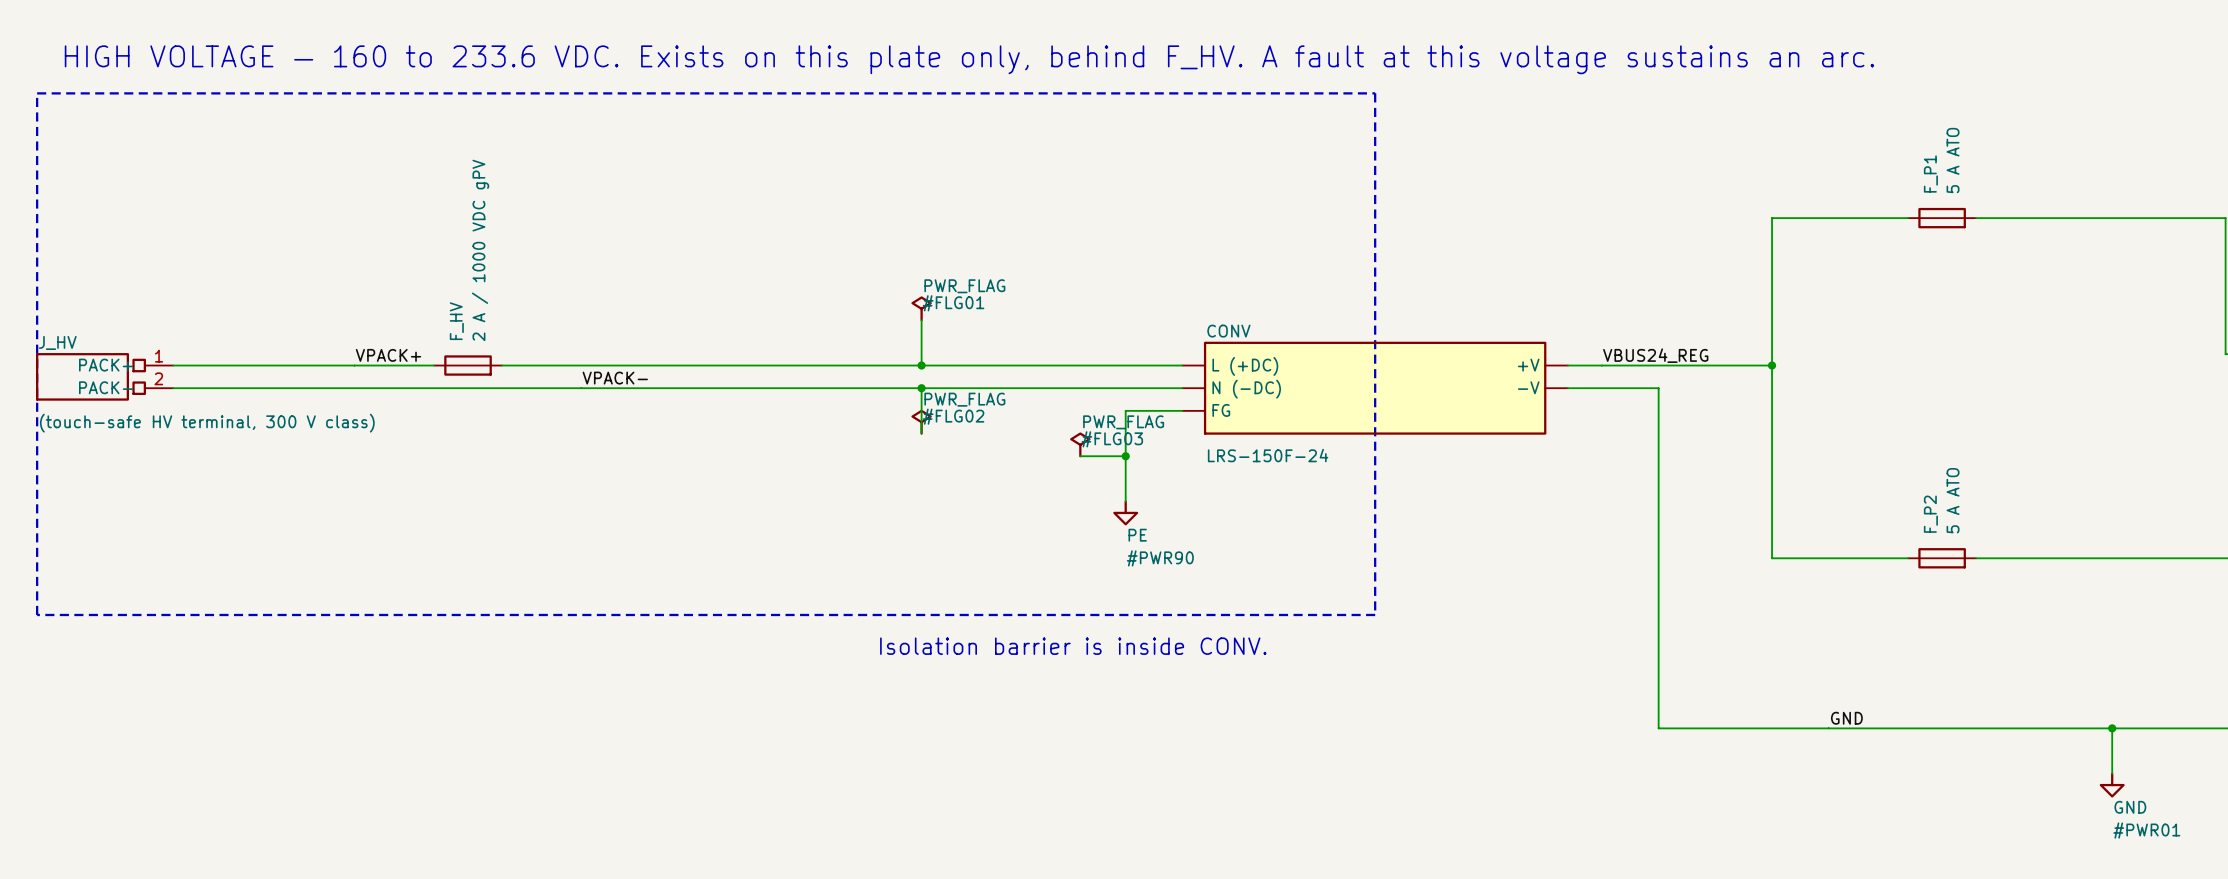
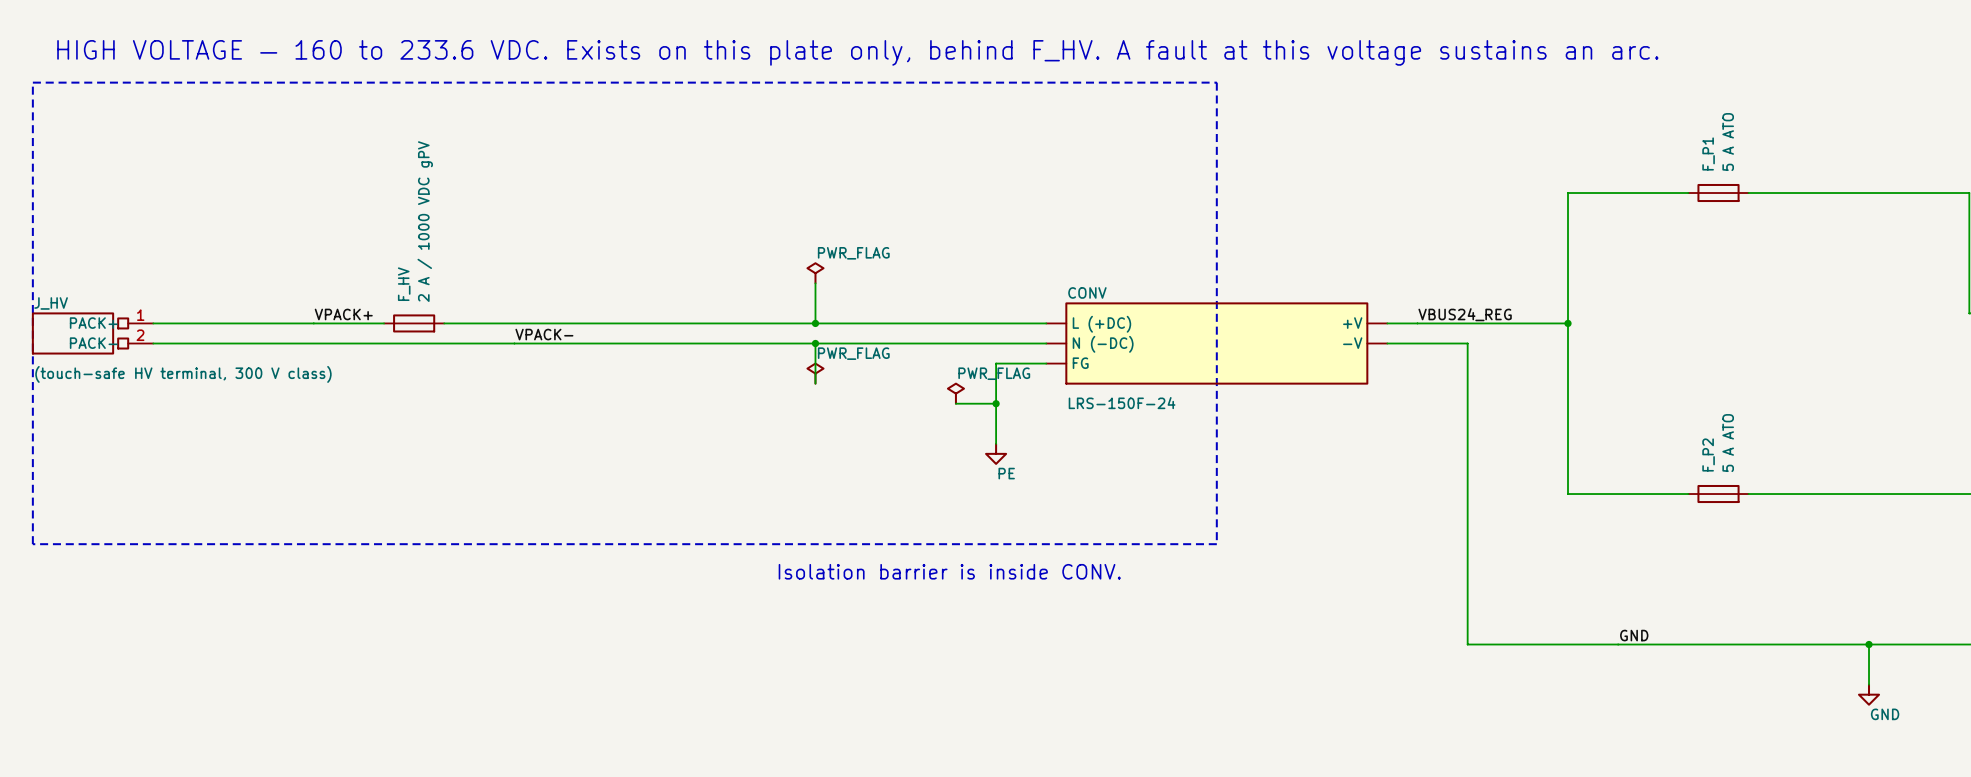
#FLG01 name: #FLG01 (953, 303) -> none
#FLG02 name: #FLG02 (953, 416) -> none
#FLG03 name: #FLG03 (1112, 439) -> none
#PWR90 name: #PWR90 (1160, 558) -> none
#PWR01 name: #PWR01 (2146, 830) -> none

